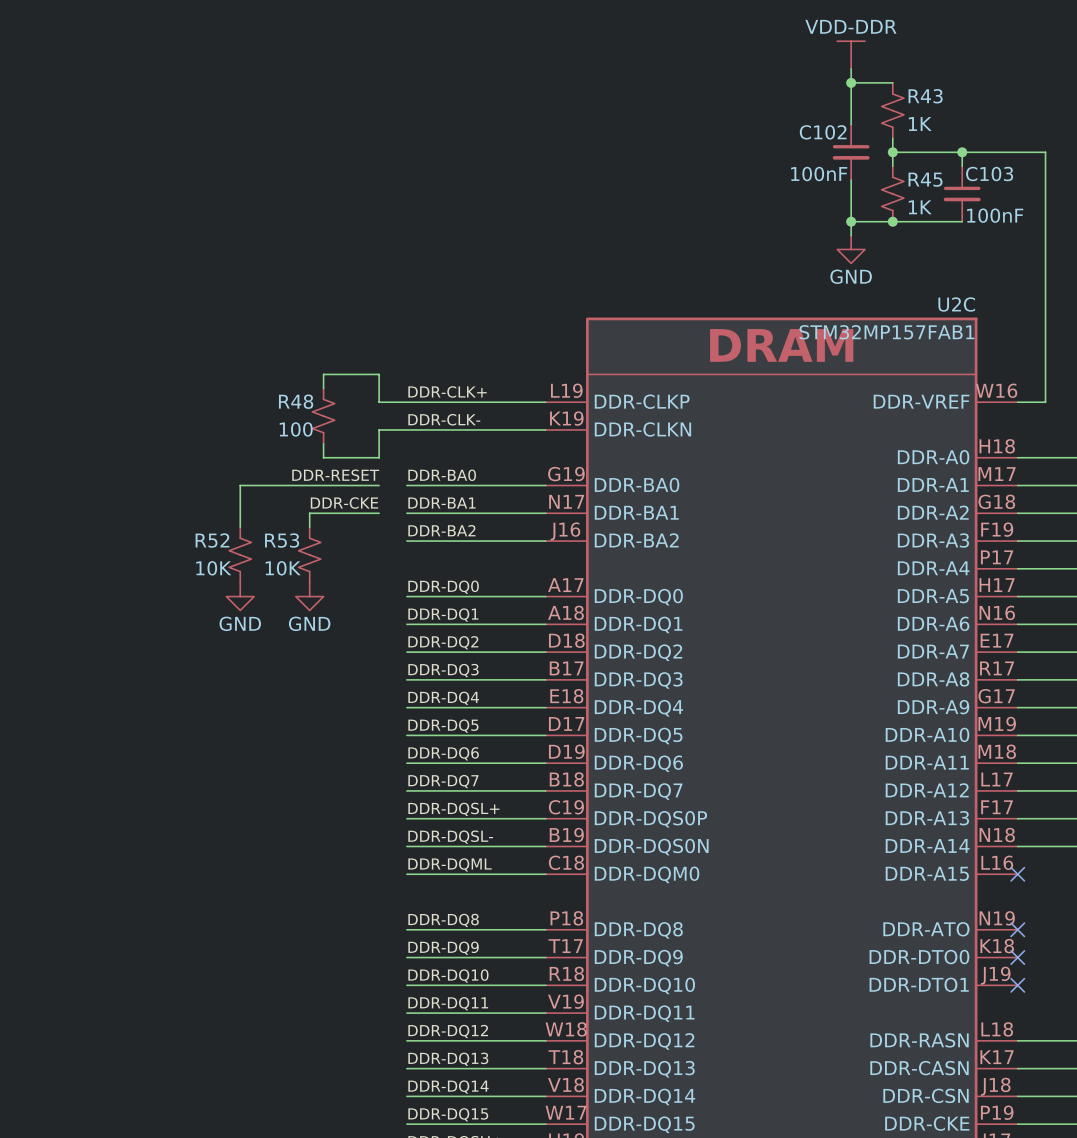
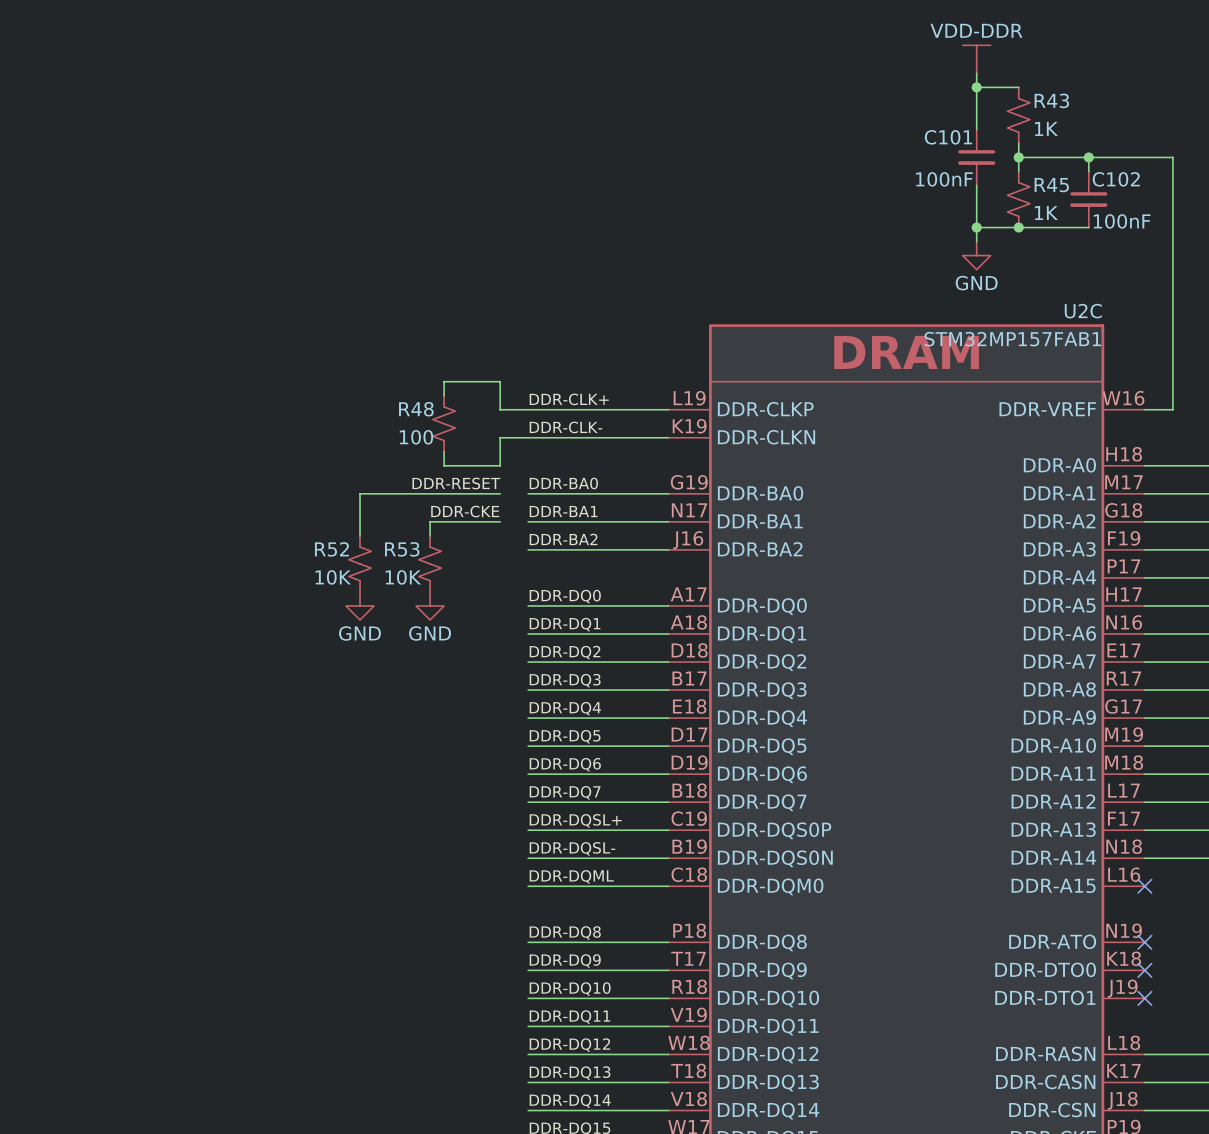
C102 name: C102 (823, 132) -> C101 (948, 137)
C103 name: C103 (989, 174) -> C102 (1116, 179)

